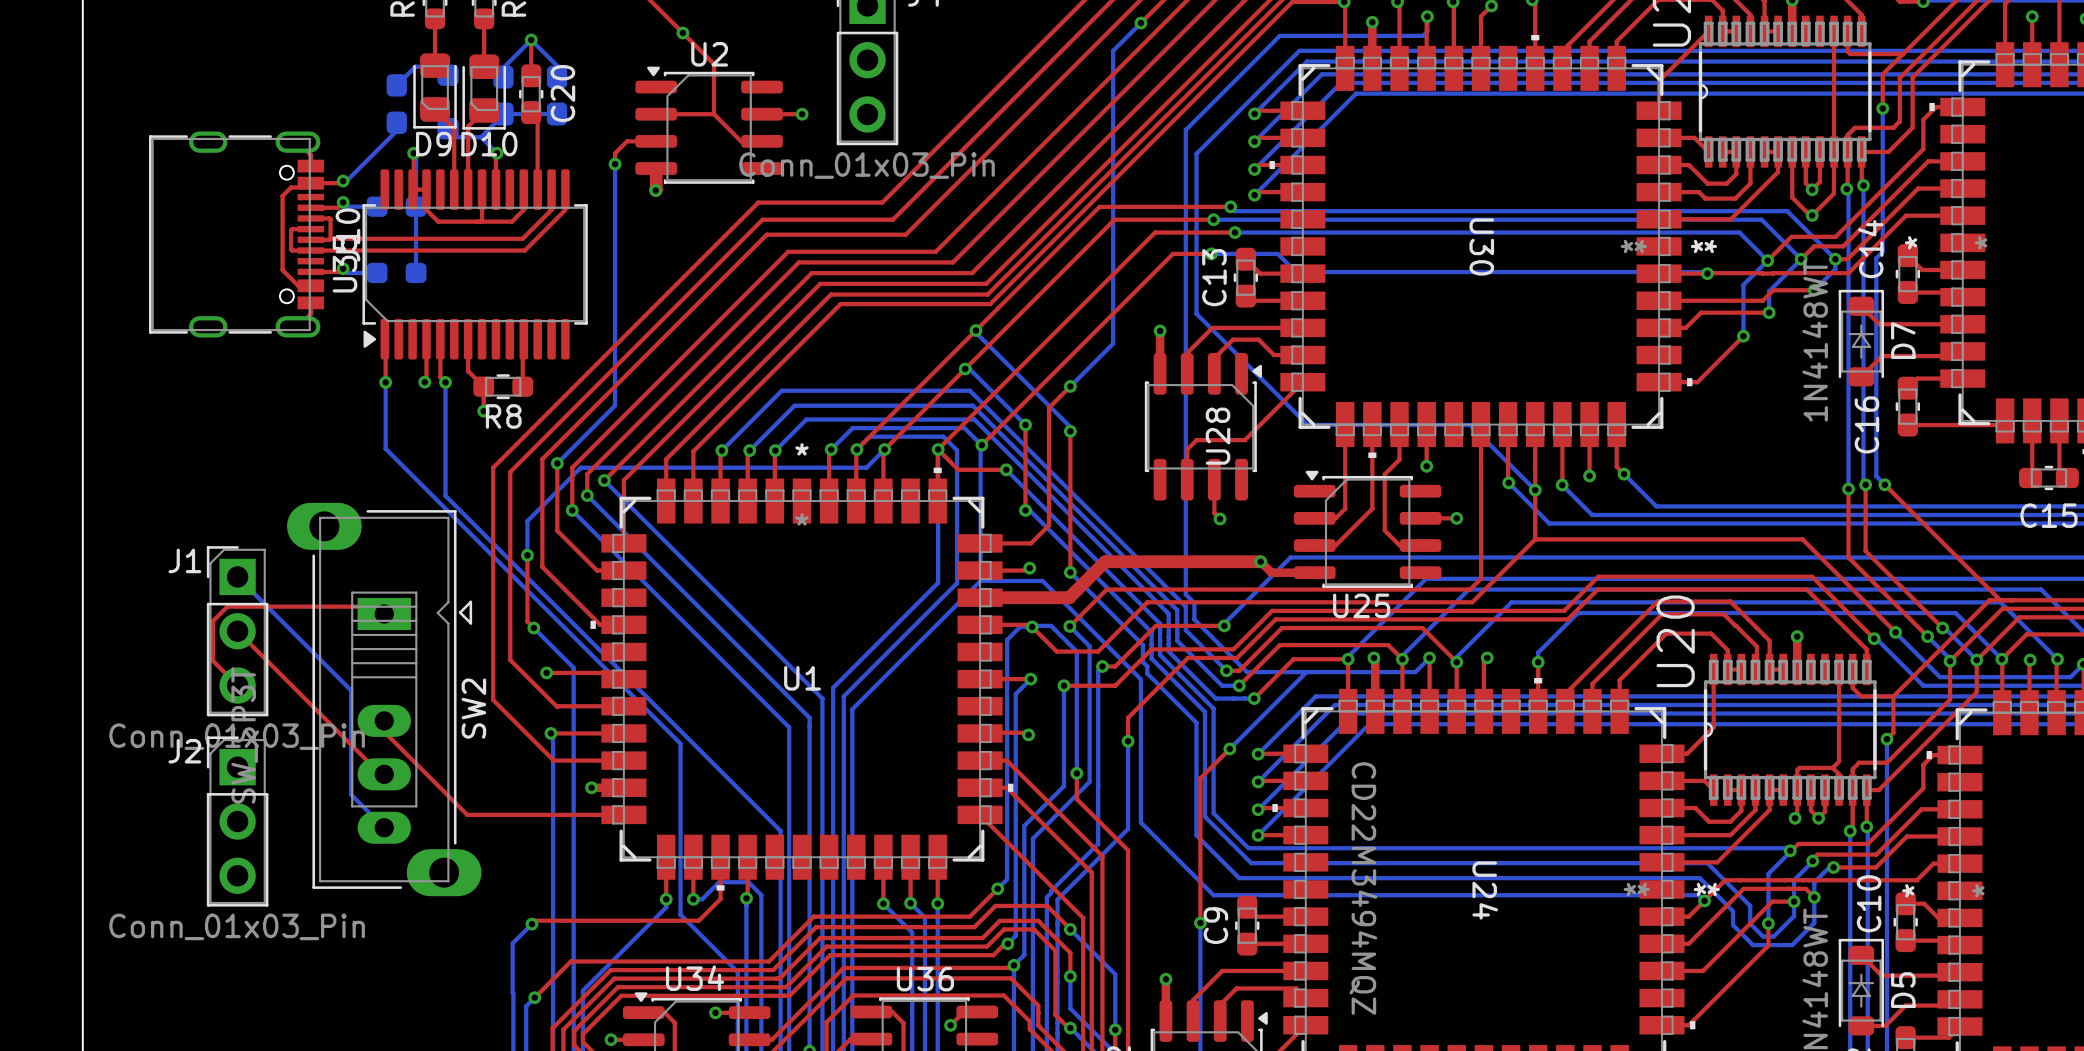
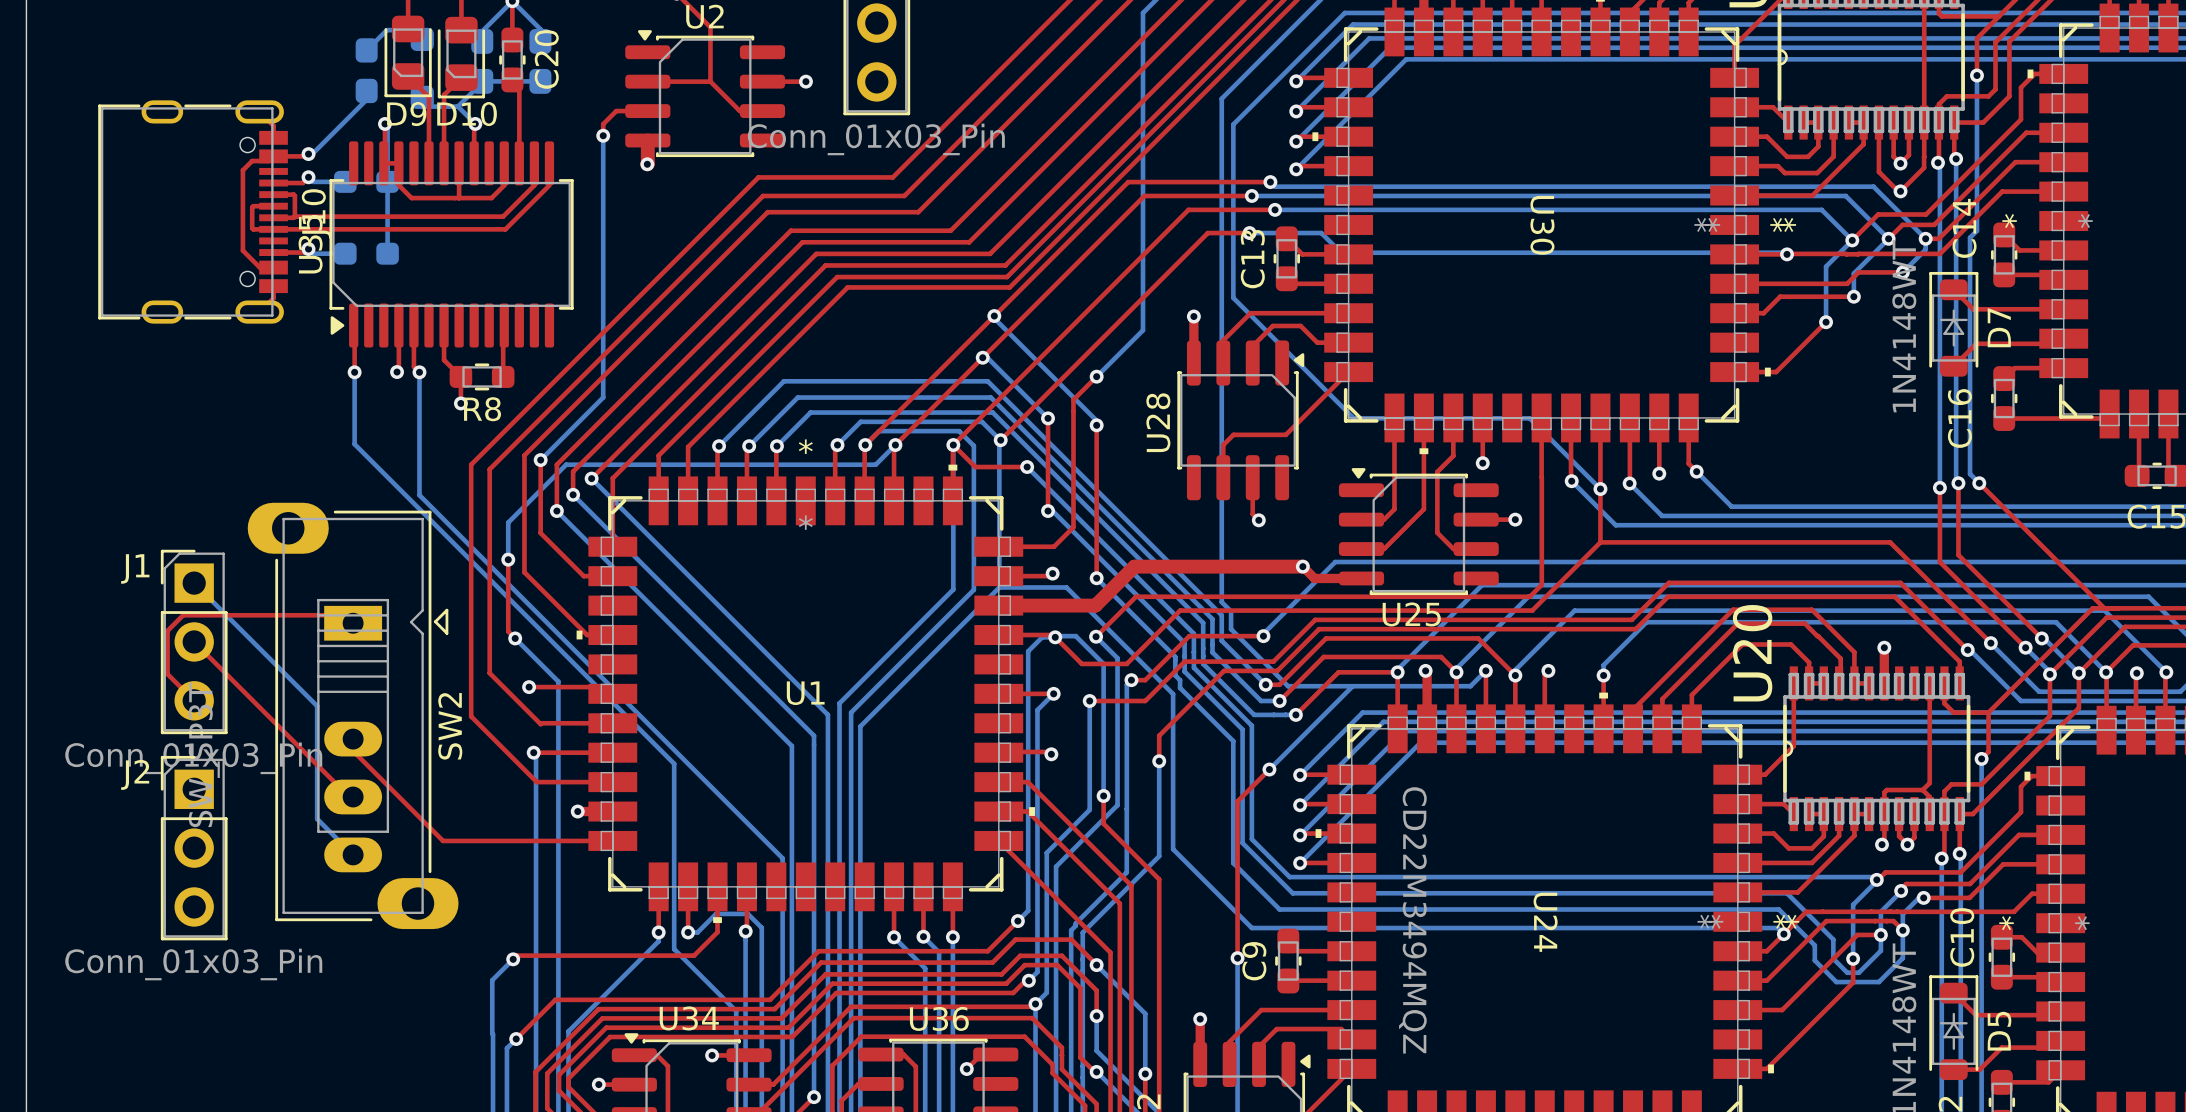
U28 name position: U28 (1218, 436) -> U28 (1158, 422)

